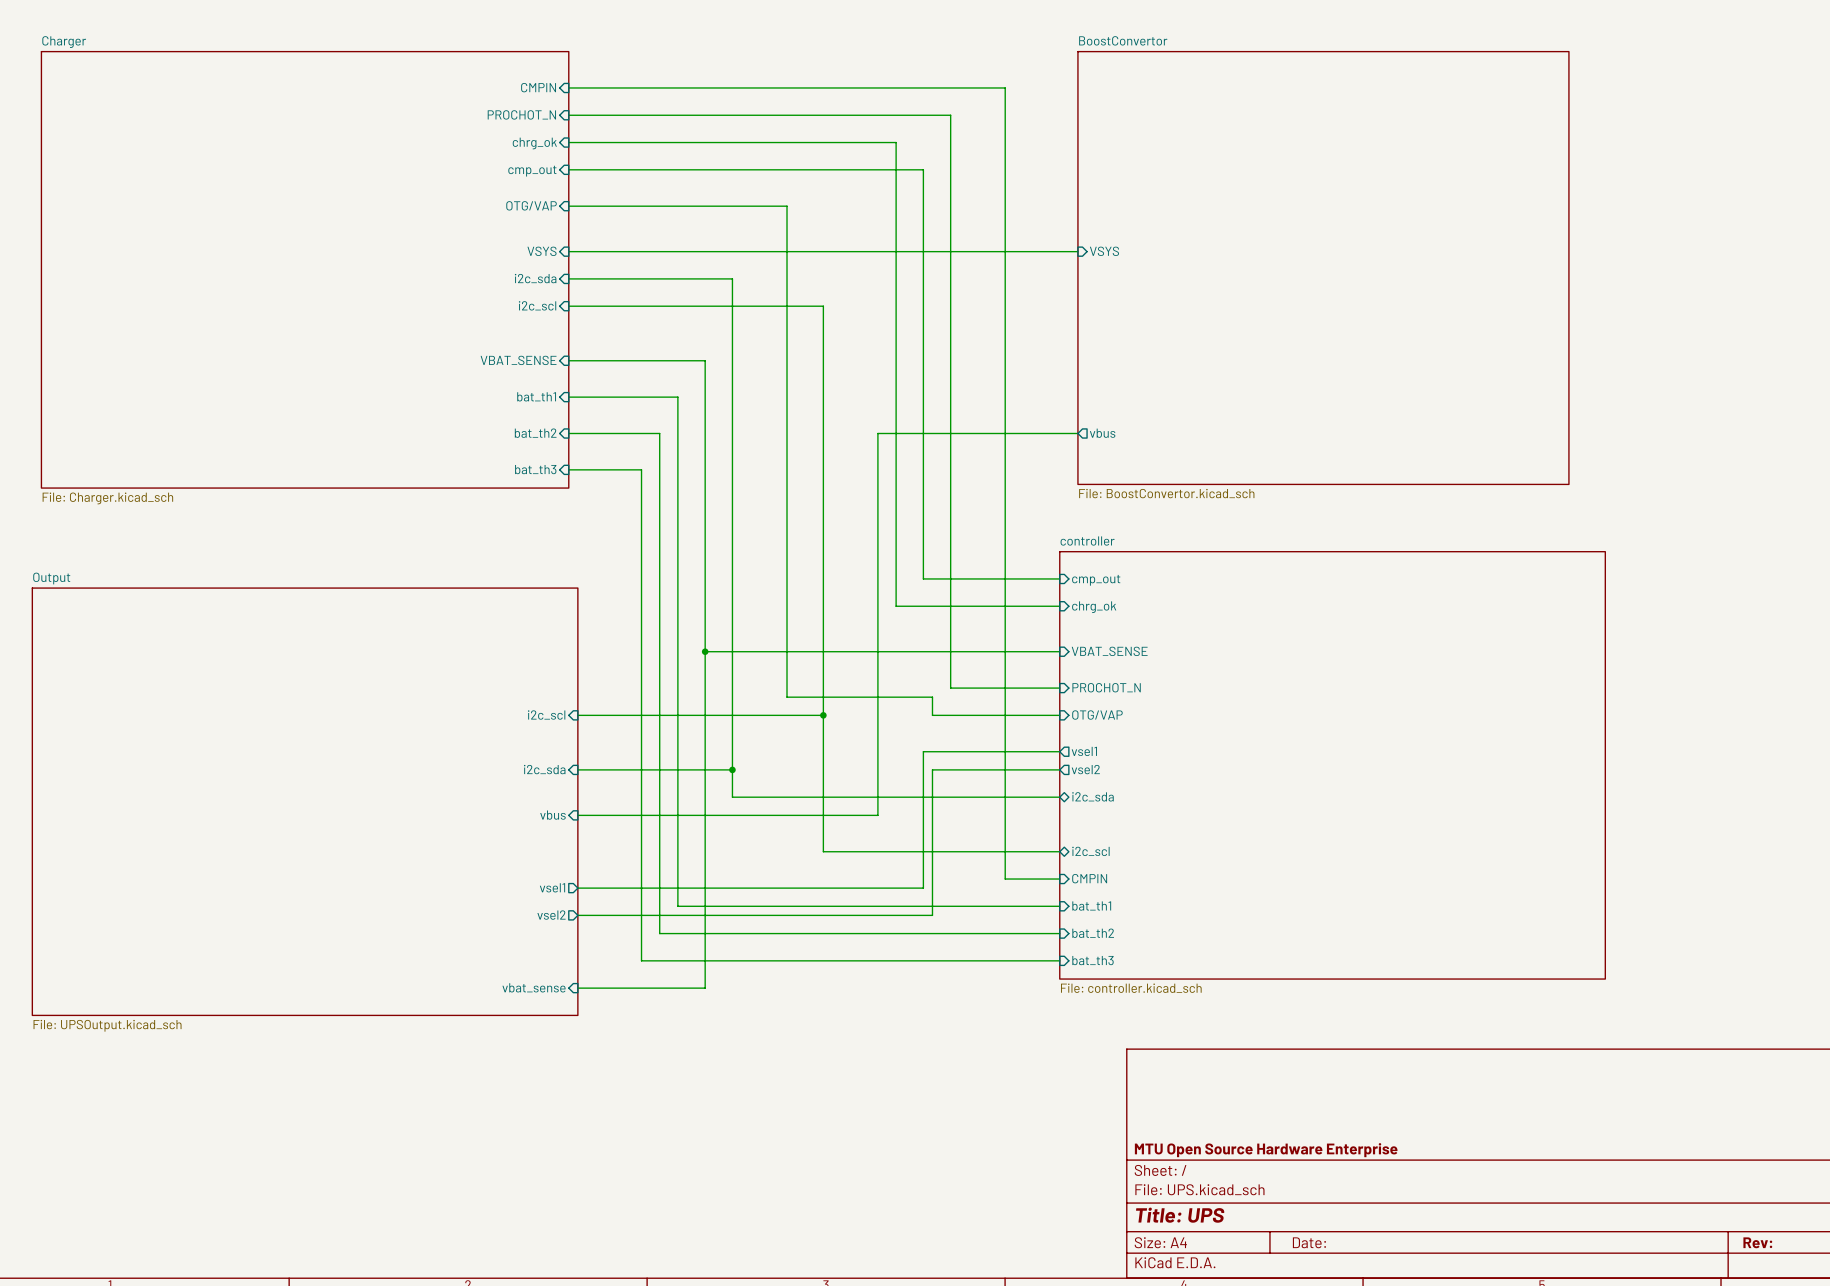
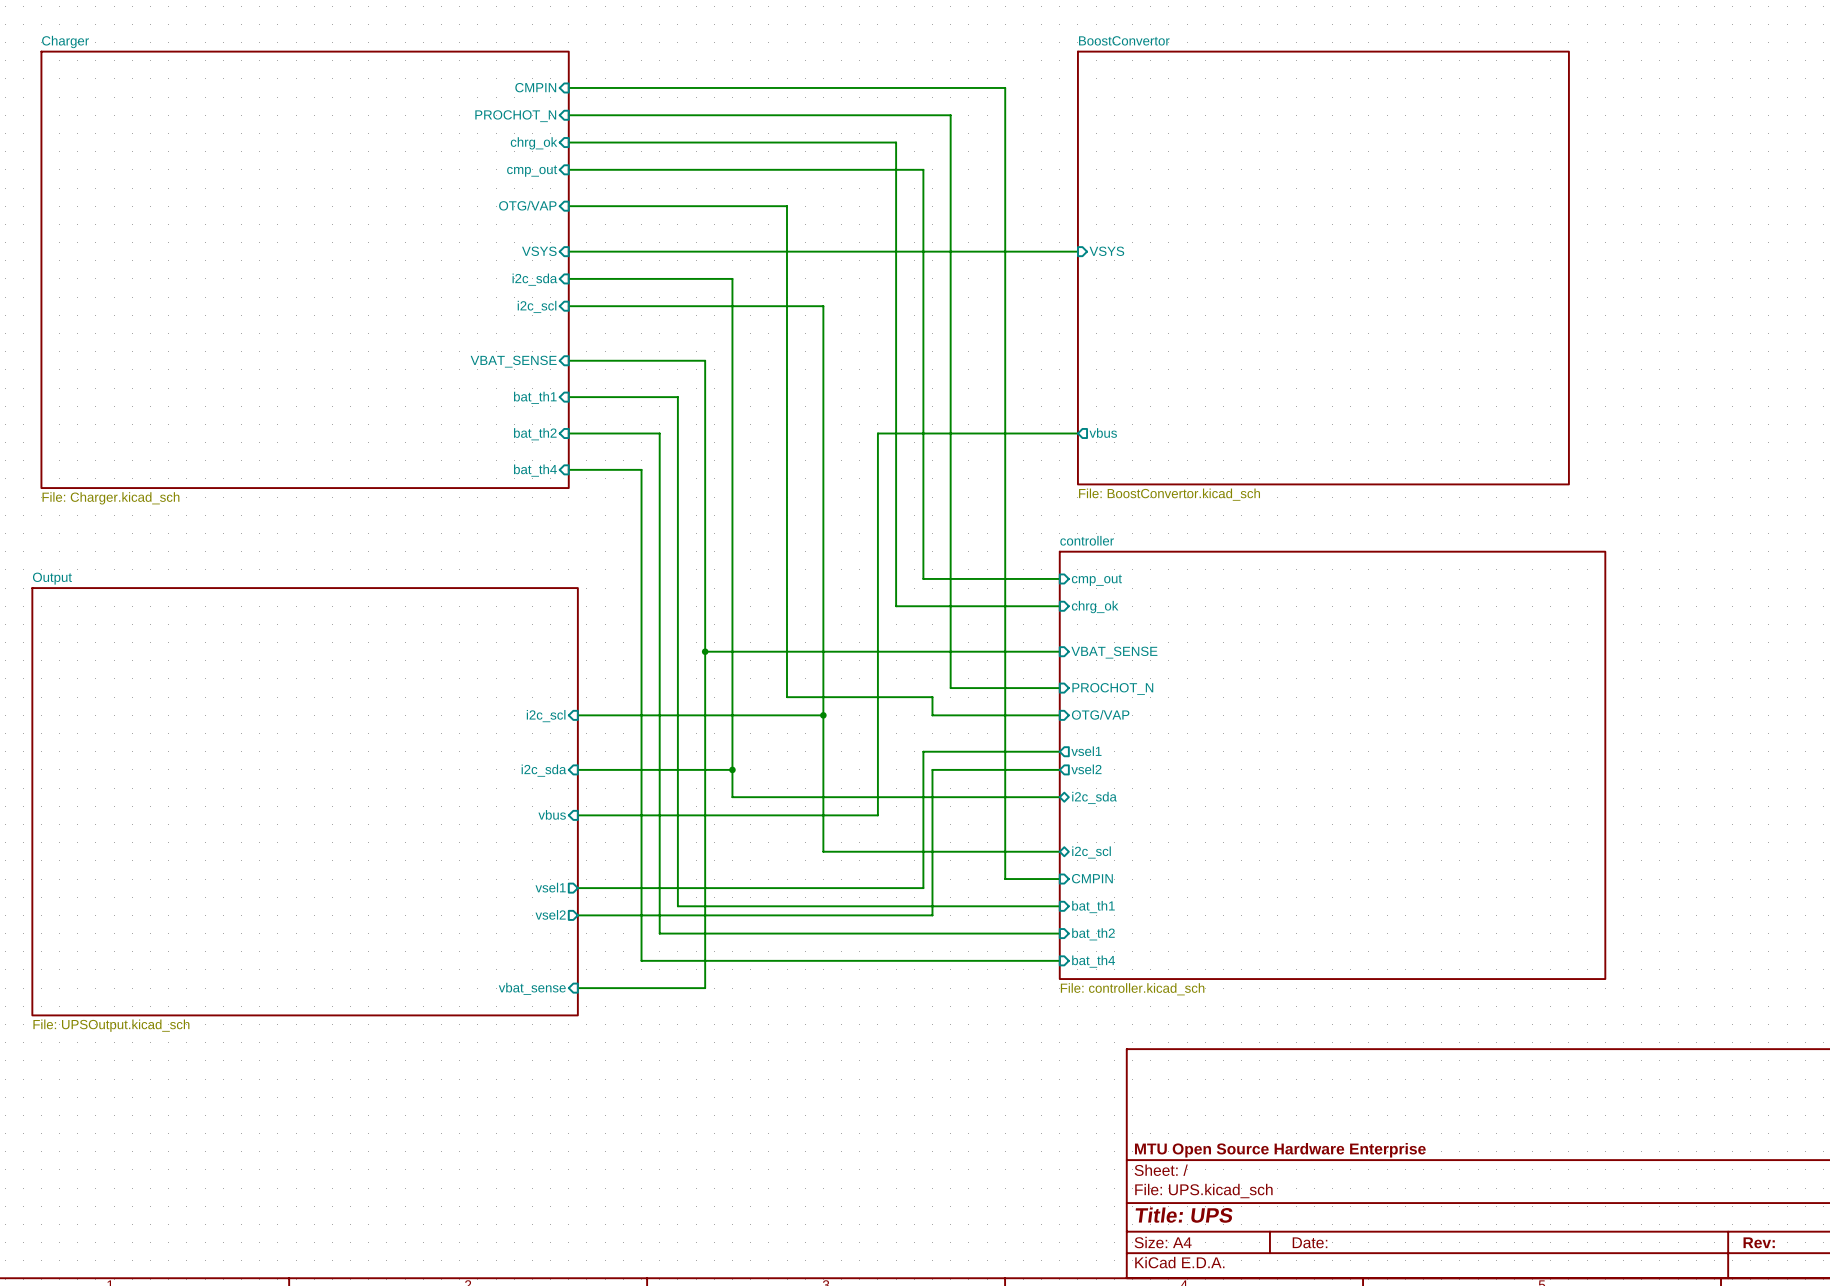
sheet pin: bat_th3 (535, 469) -> bat_th4 (535, 470)
sheet pin: bat_th3 (1092, 960) -> bat_th4 (1093, 961)

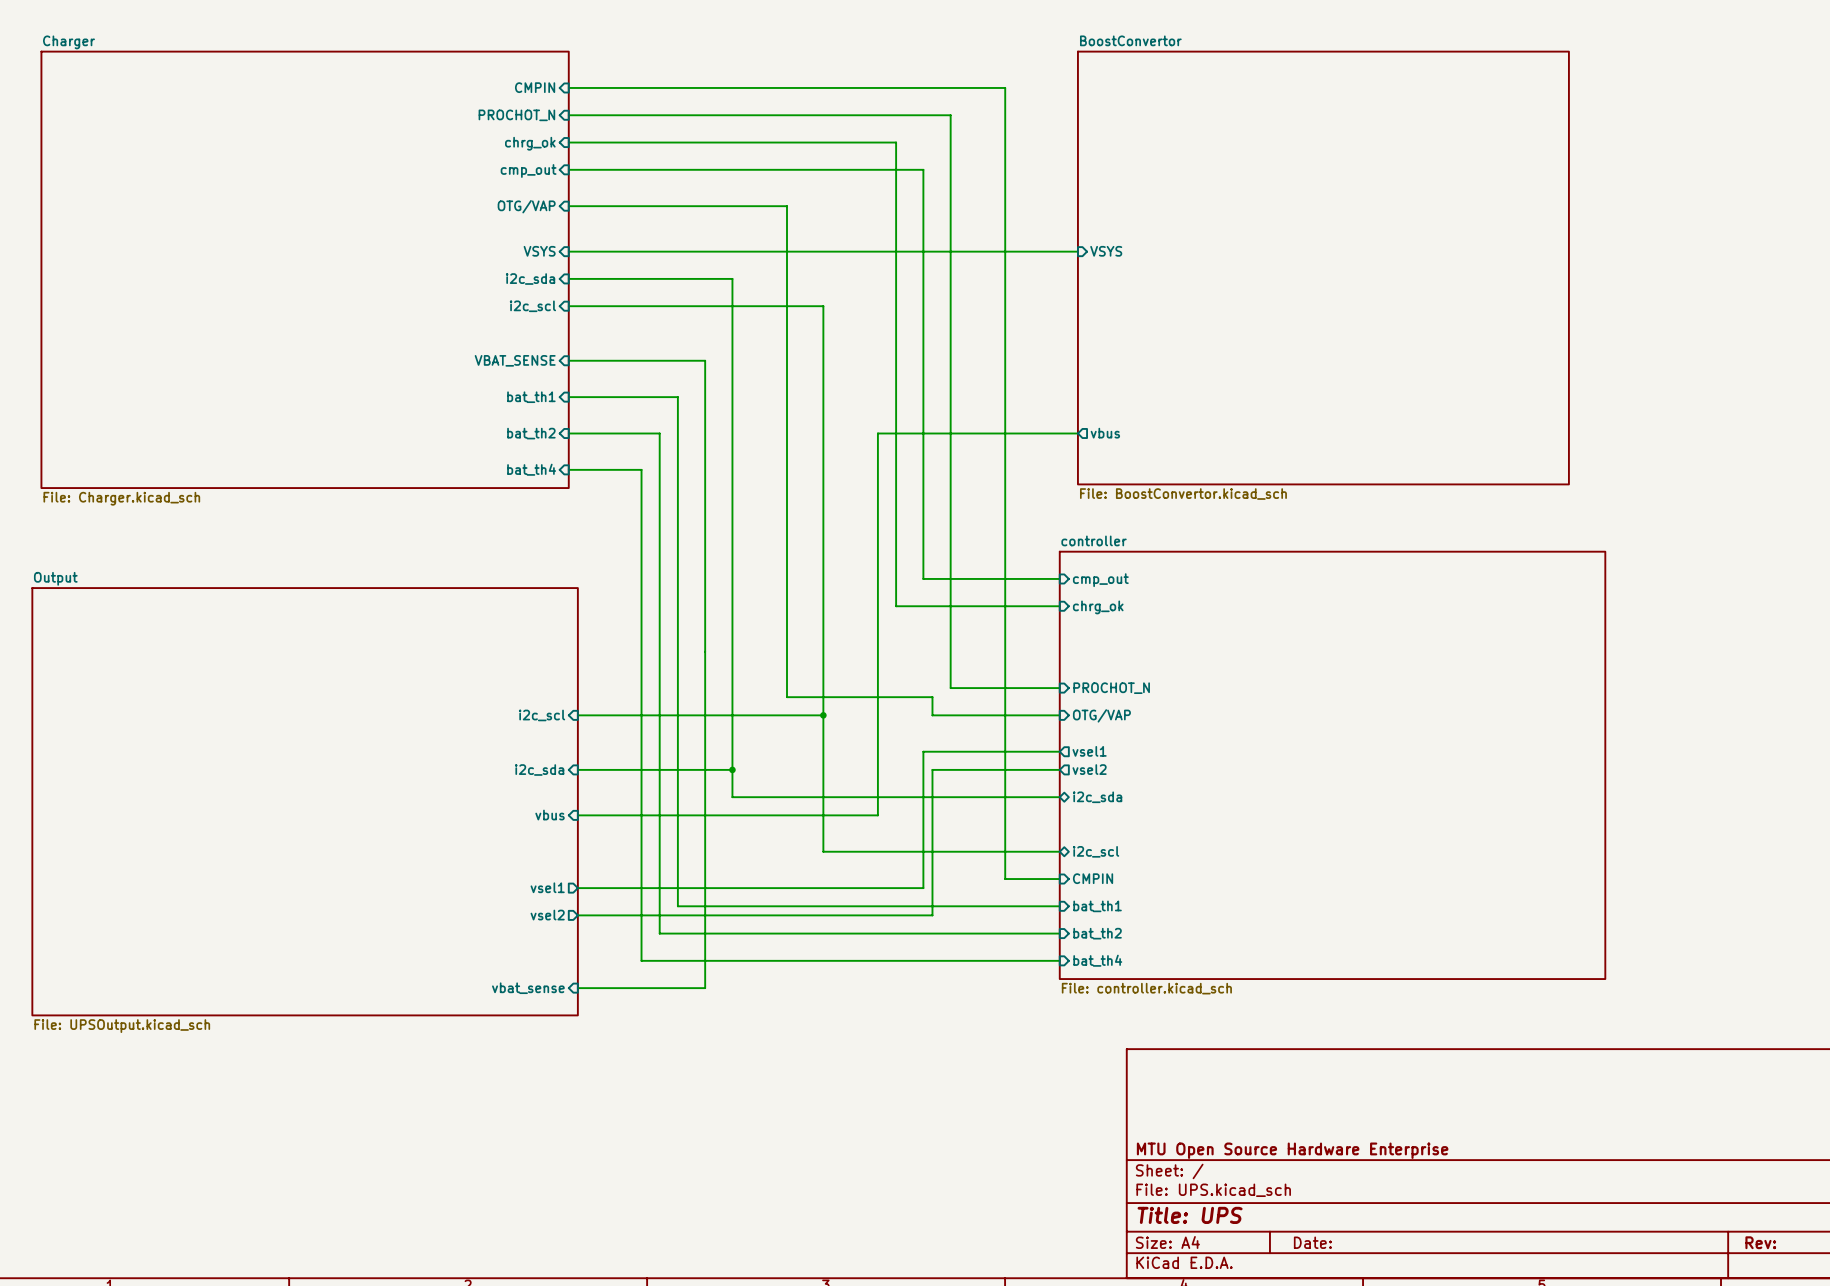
wire: (705, 651) (1059, 651) -> none
junction: (705, 651) -> none
sheet pin: VBAT_SENSE (1114, 652) -> none

